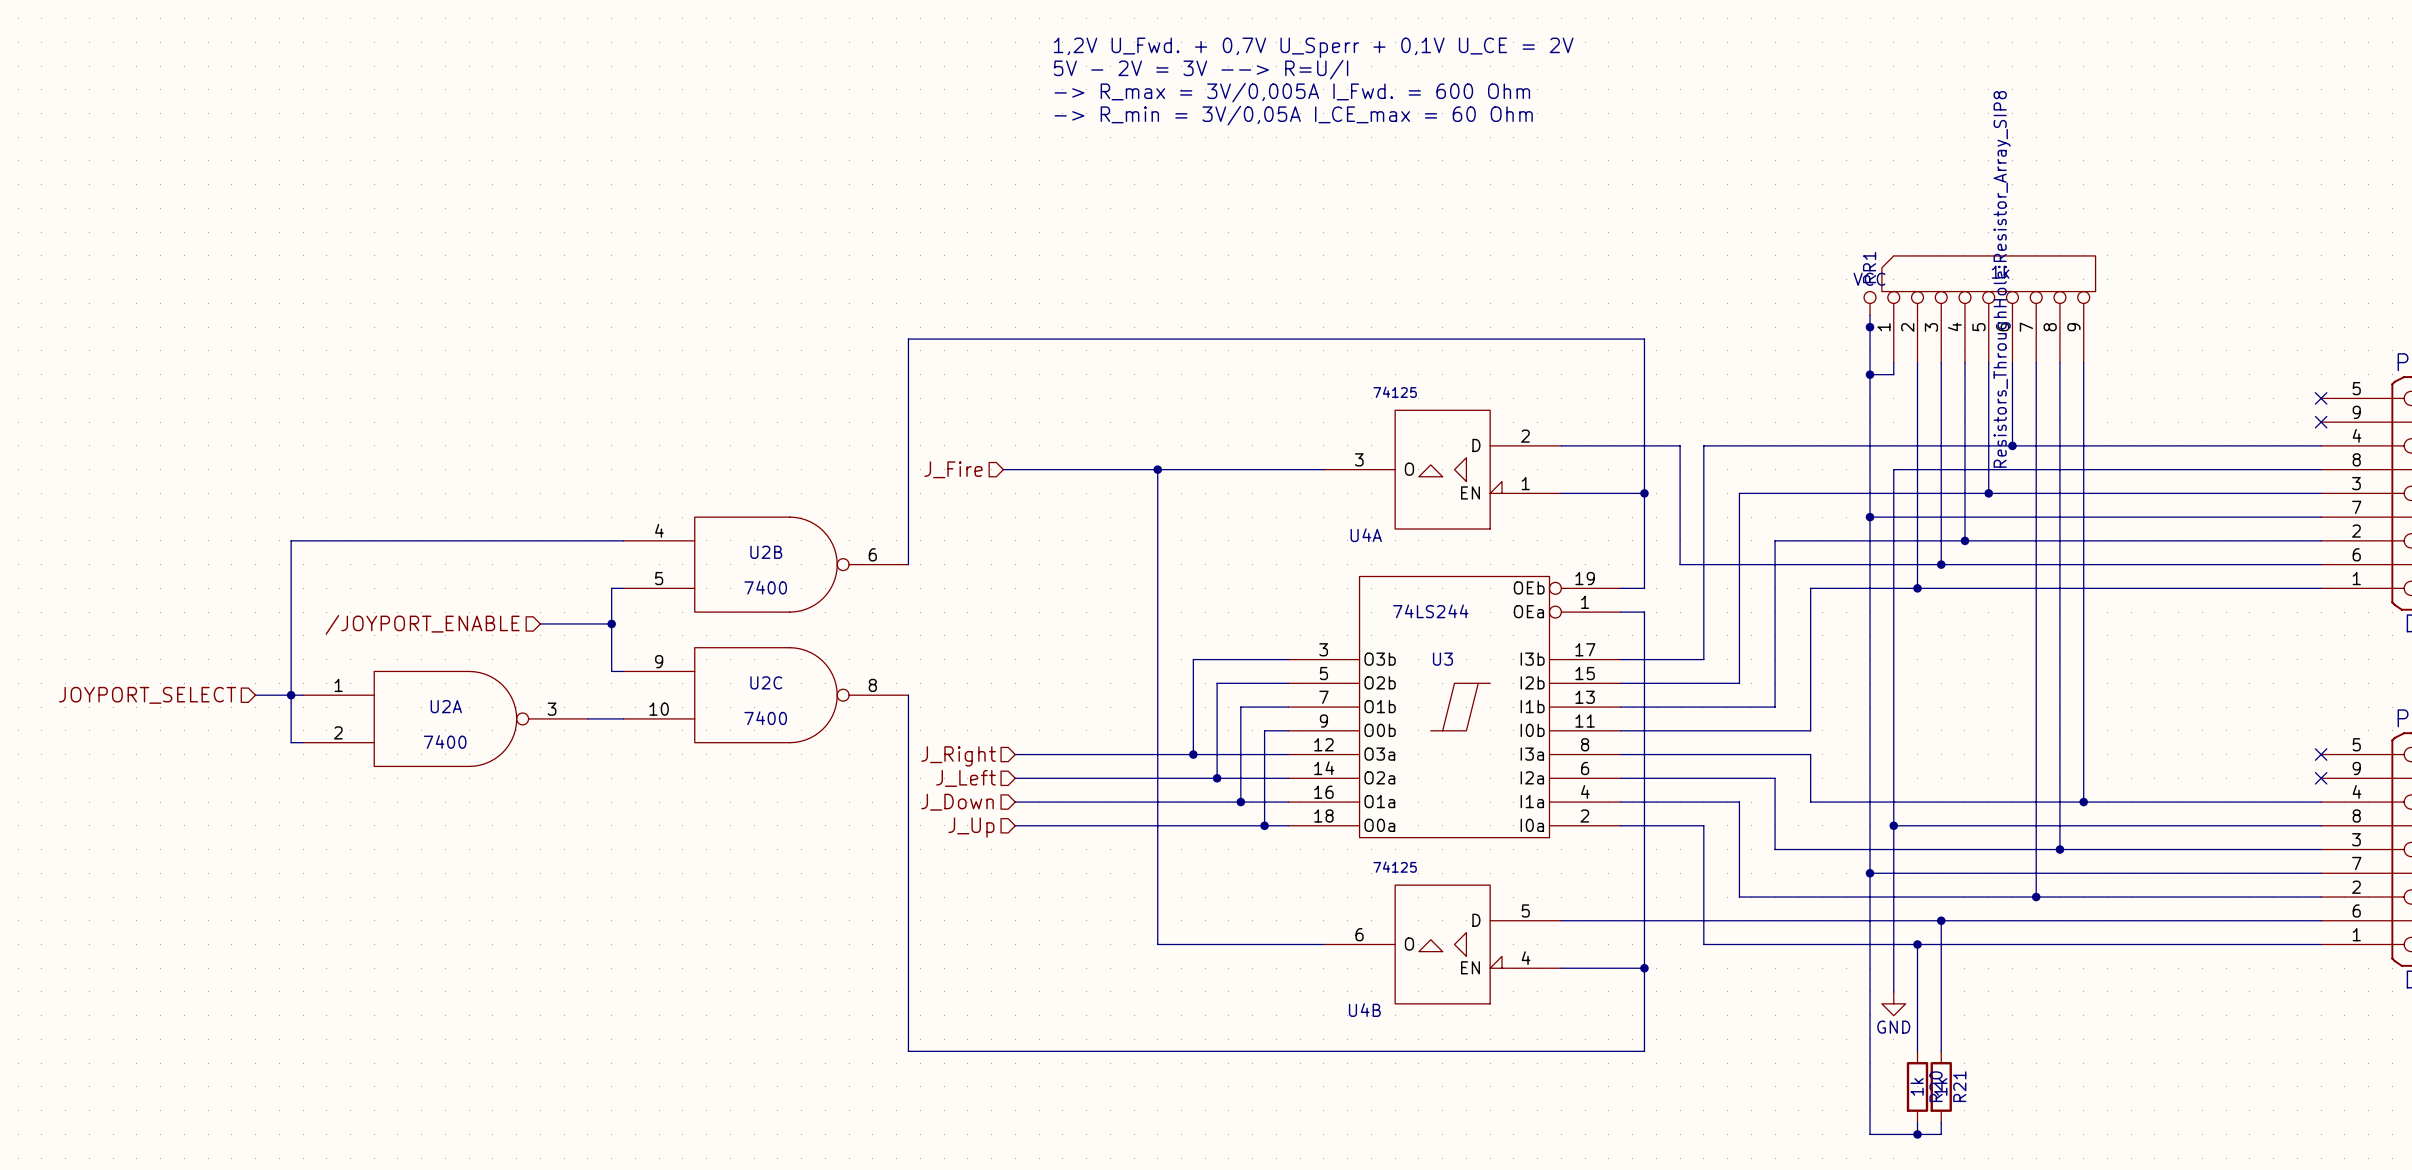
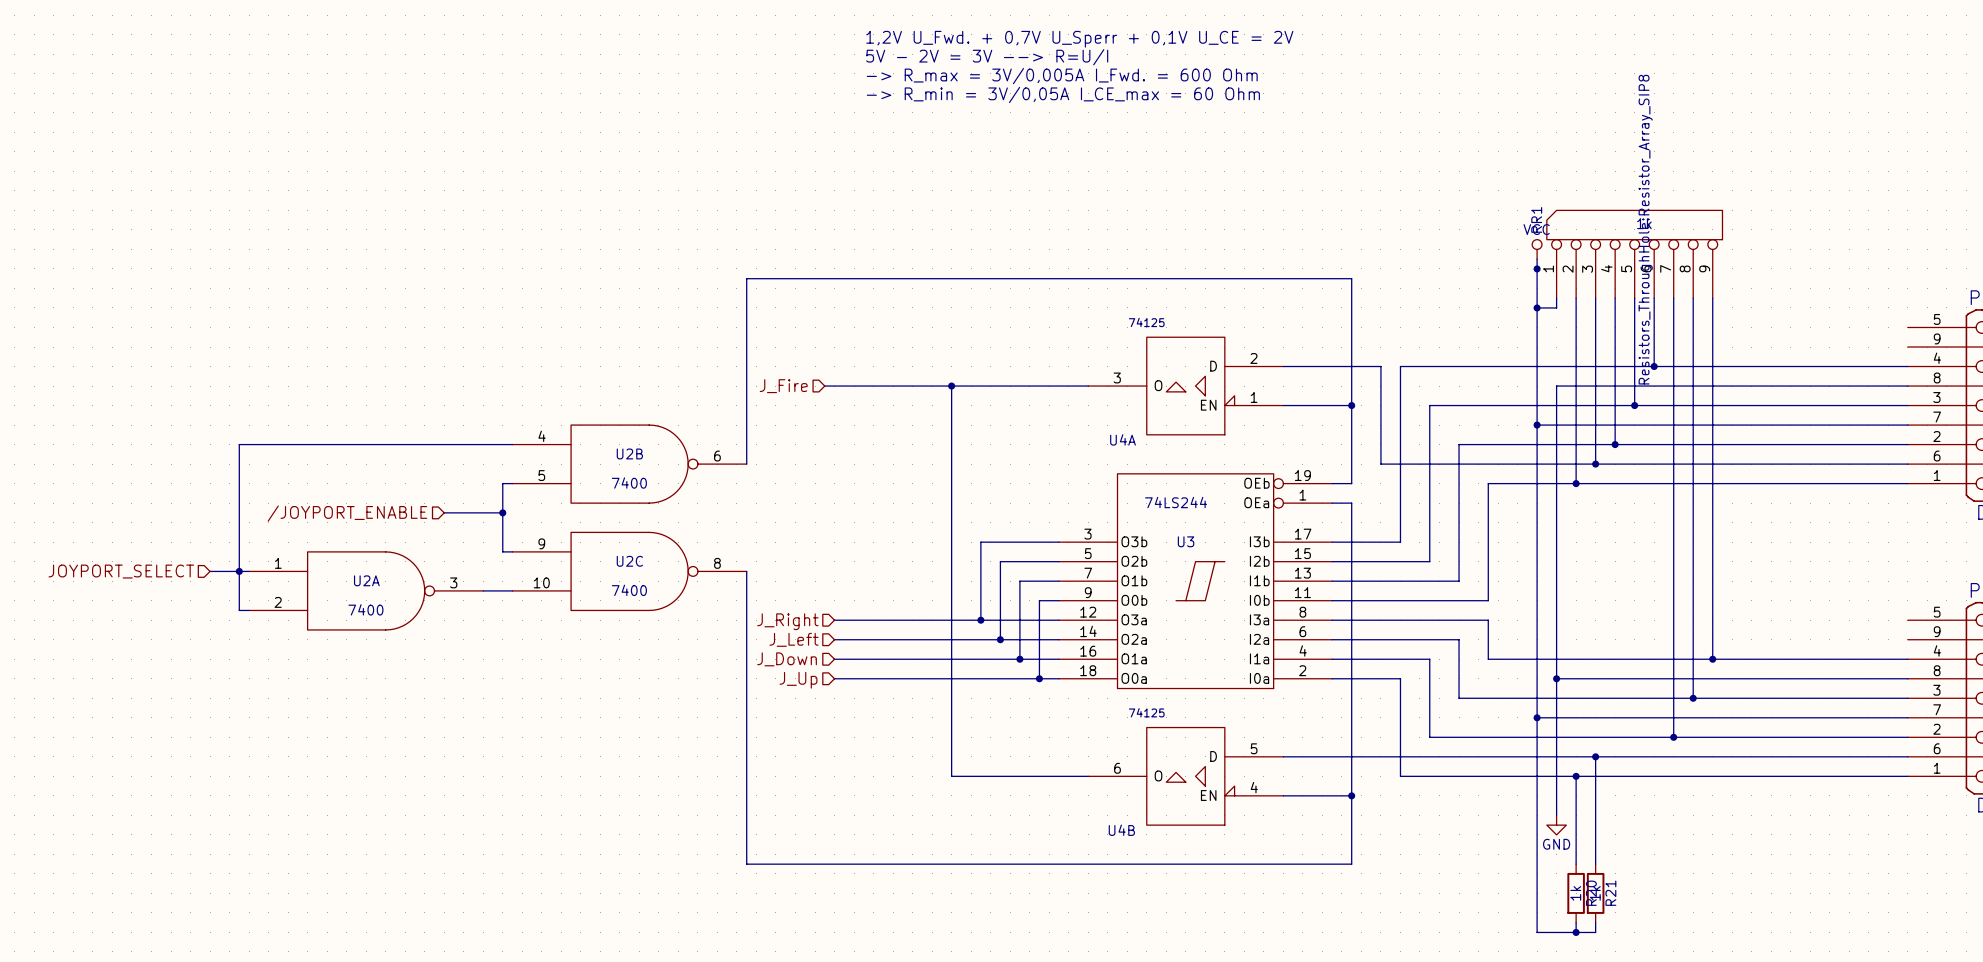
no-connect mark: (2321, 398) -> none
no-connect mark: (2321, 422) -> none
no-connect mark: (2321, 754) -> none
no-connect mark: (2321, 778) -> none

